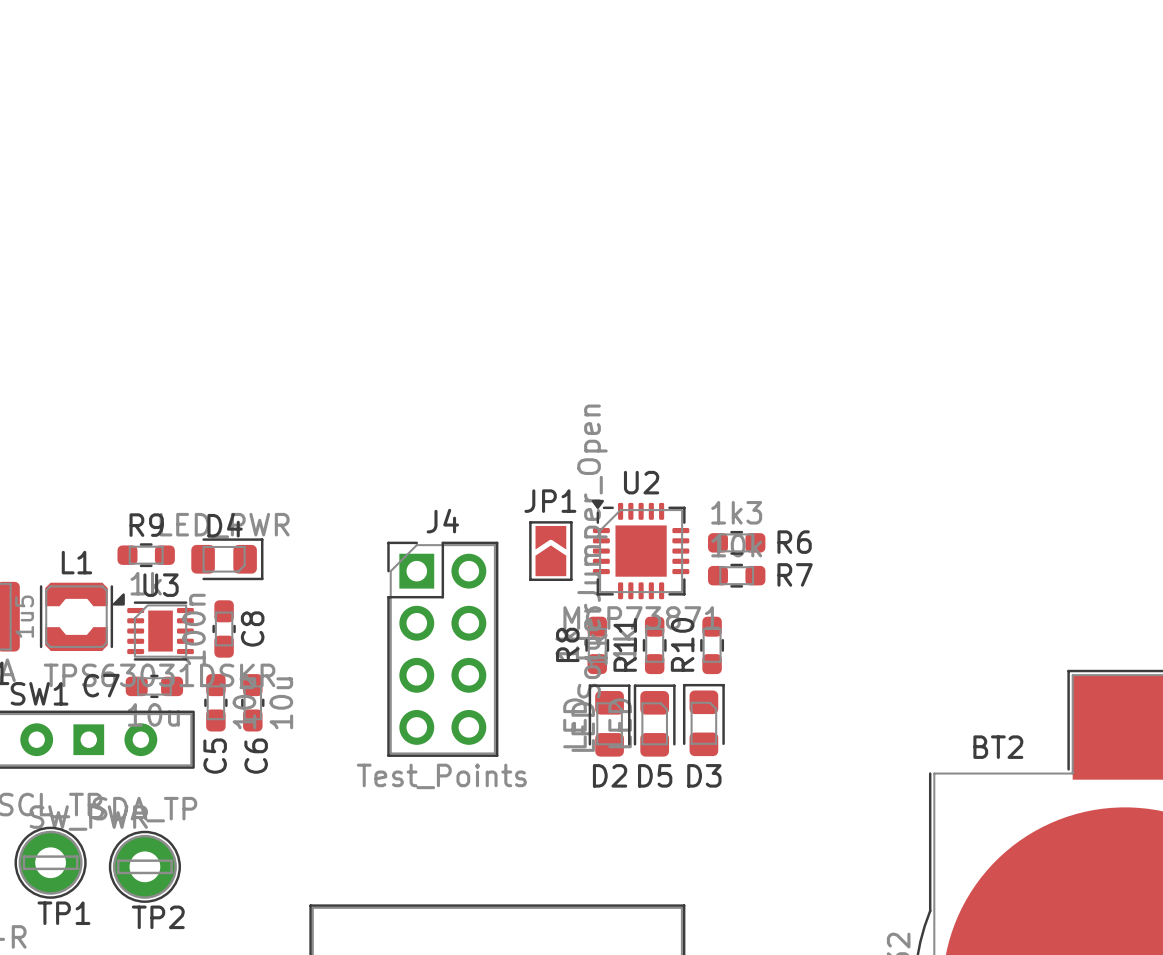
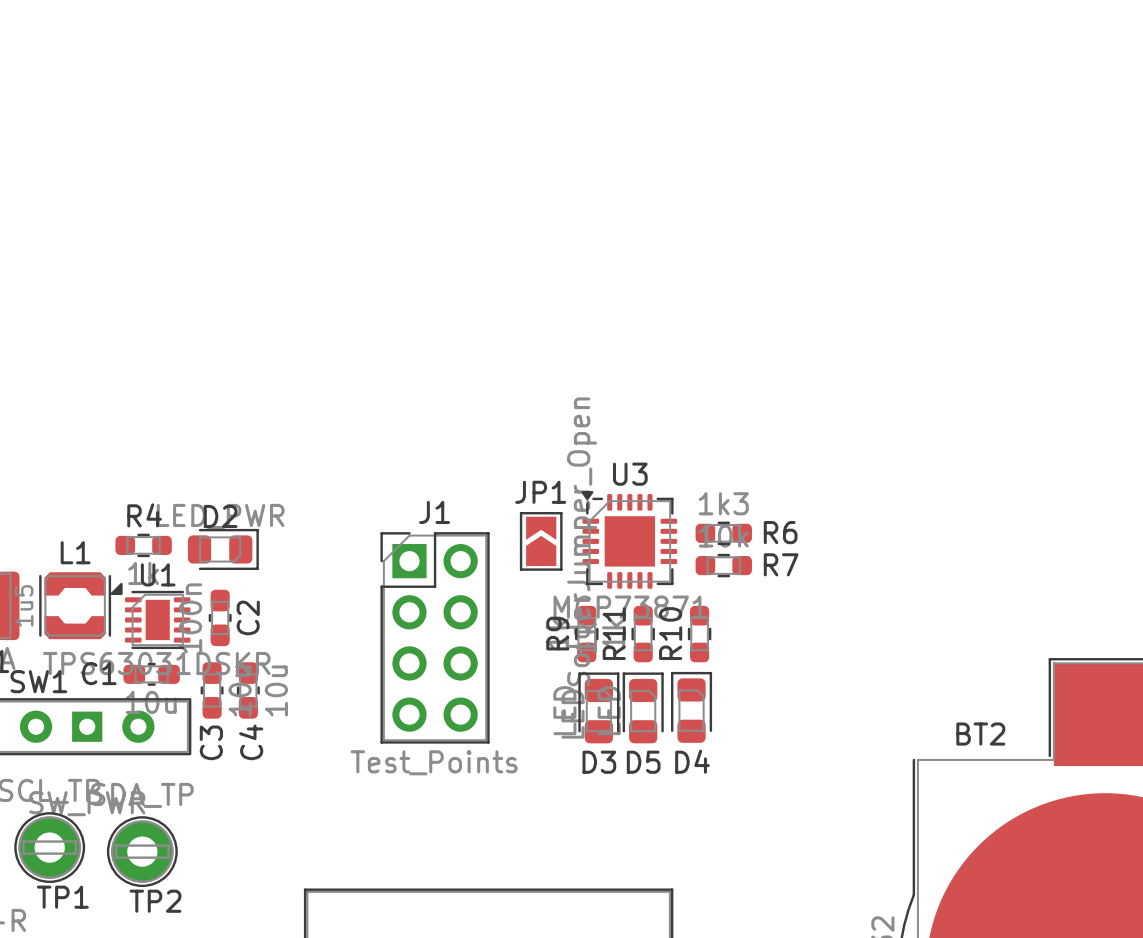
U2 name: U2 (641, 482) -> U3 (630, 474)
J4 name: J4 (442, 521) -> J1 (434, 512)
R9 name: R9 (146, 525) -> R4 (144, 515)
D4 name: D4 (225, 525) -> D2 (220, 516)
U3 name: U3 (161, 585) -> U1 (158, 574)
C8 name: C8 (252, 628) -> C2 (248, 617)
R8 name: R8 (567, 644) -> R9 (557, 633)
C7 name: C7 (101, 685) -> C1 (99, 673)
C5 name: C5 (215, 756) -> C3 (211, 742)
C6 name: C6 (256, 756) -> C4 (251, 742)
D2 name: D2 (610, 775) -> D3 (599, 762)
D3 name: D3 (704, 775) -> D4 (692, 761)

